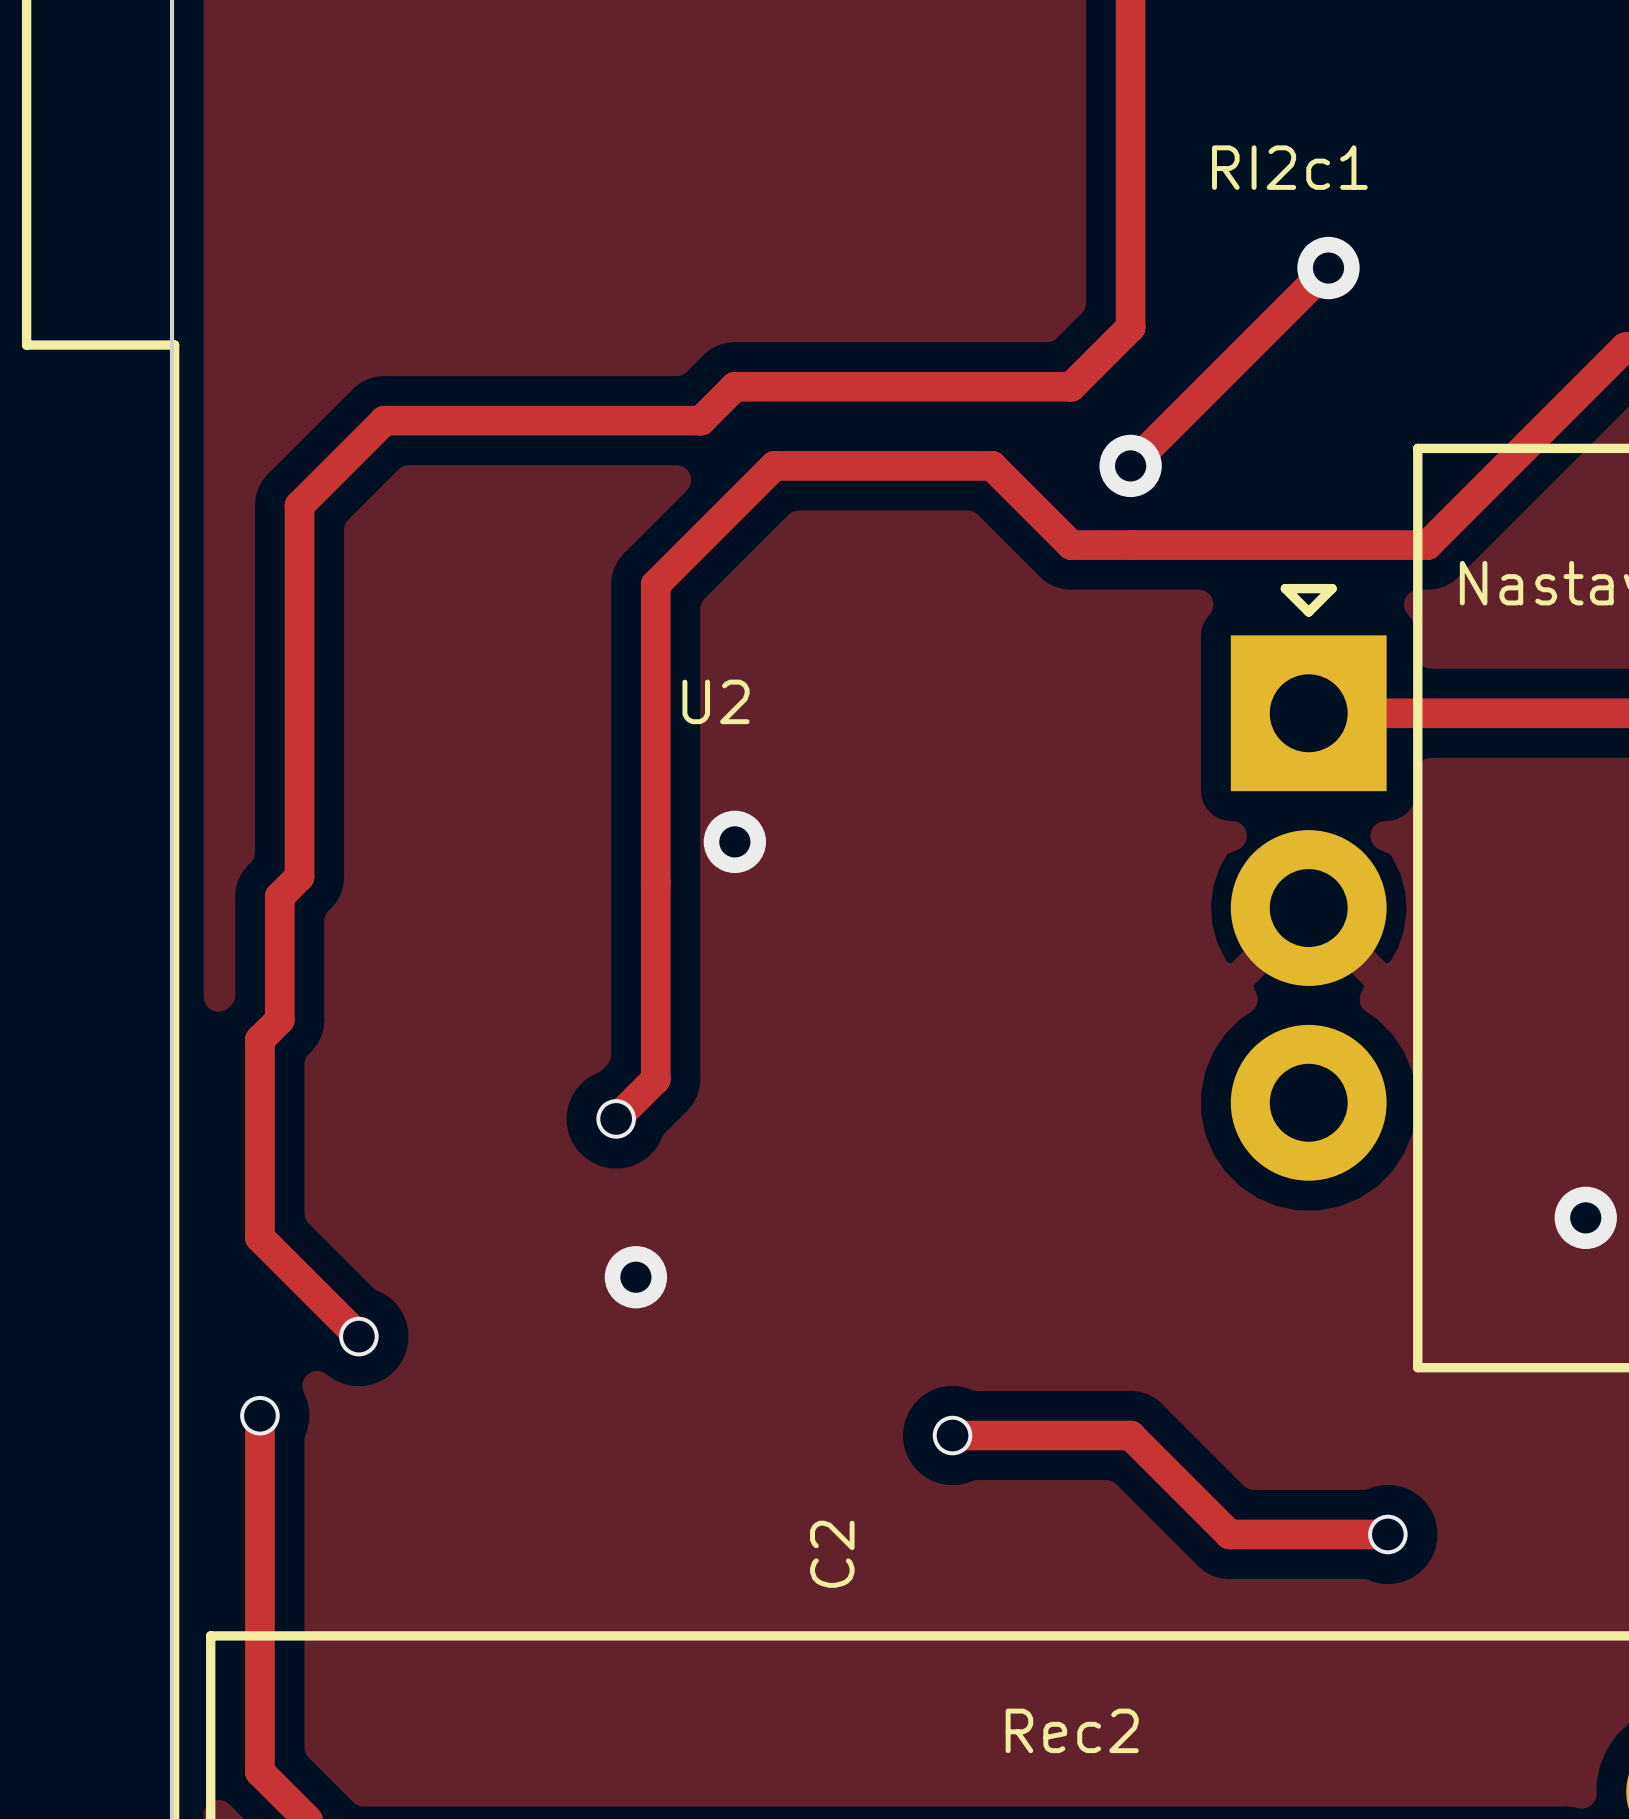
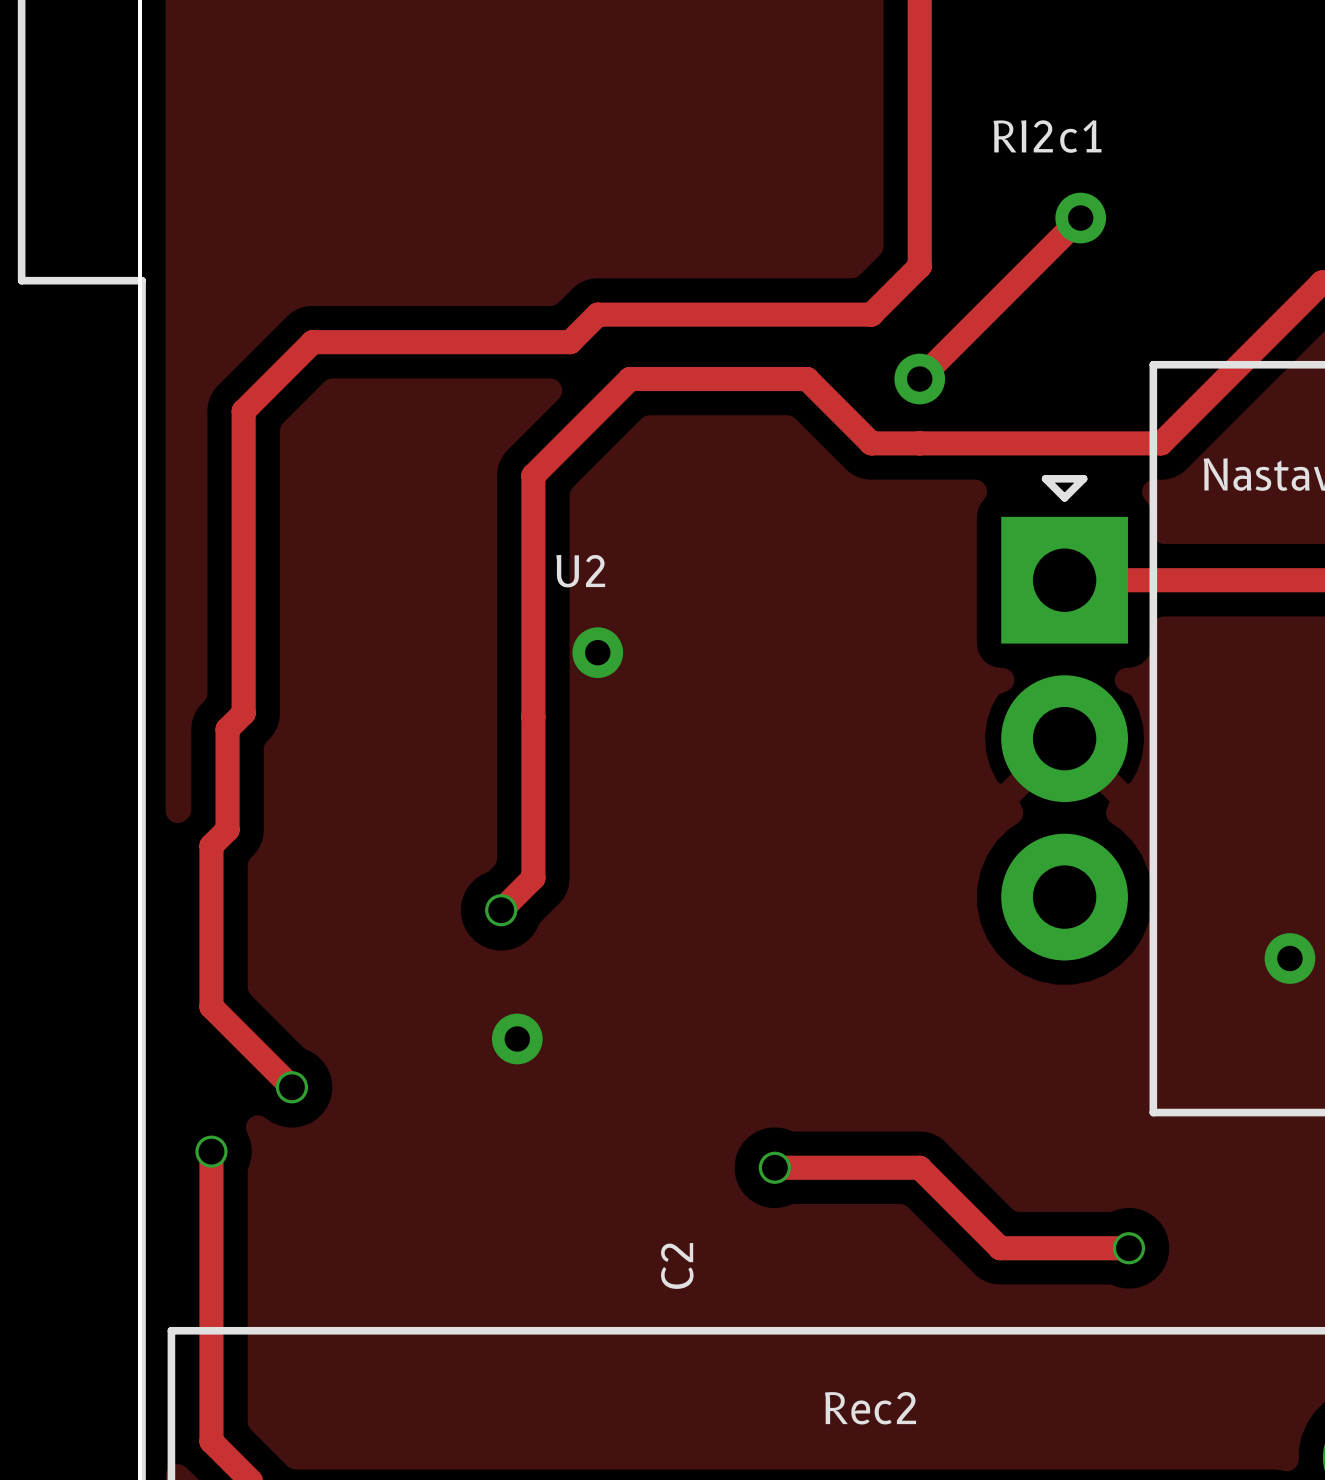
via position: (734, 841) -> (597, 652)
via position: (1585, 1217) -> (1289, 958)

